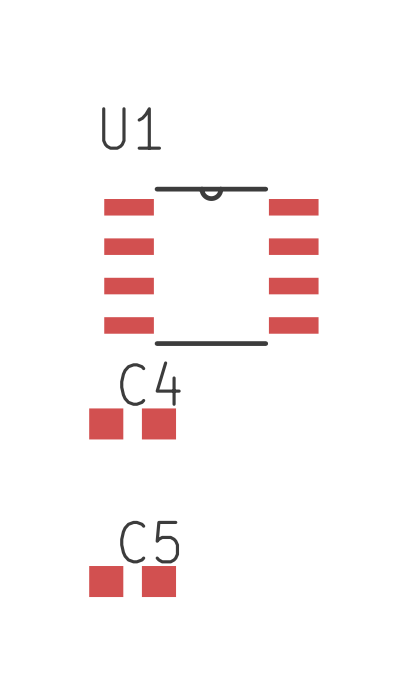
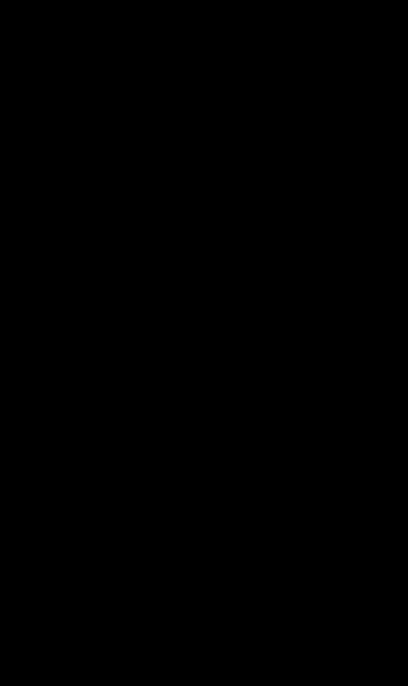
U1: (211, 266) -> none
C4: (132, 423) -> none
C5: (132, 581) -> none

